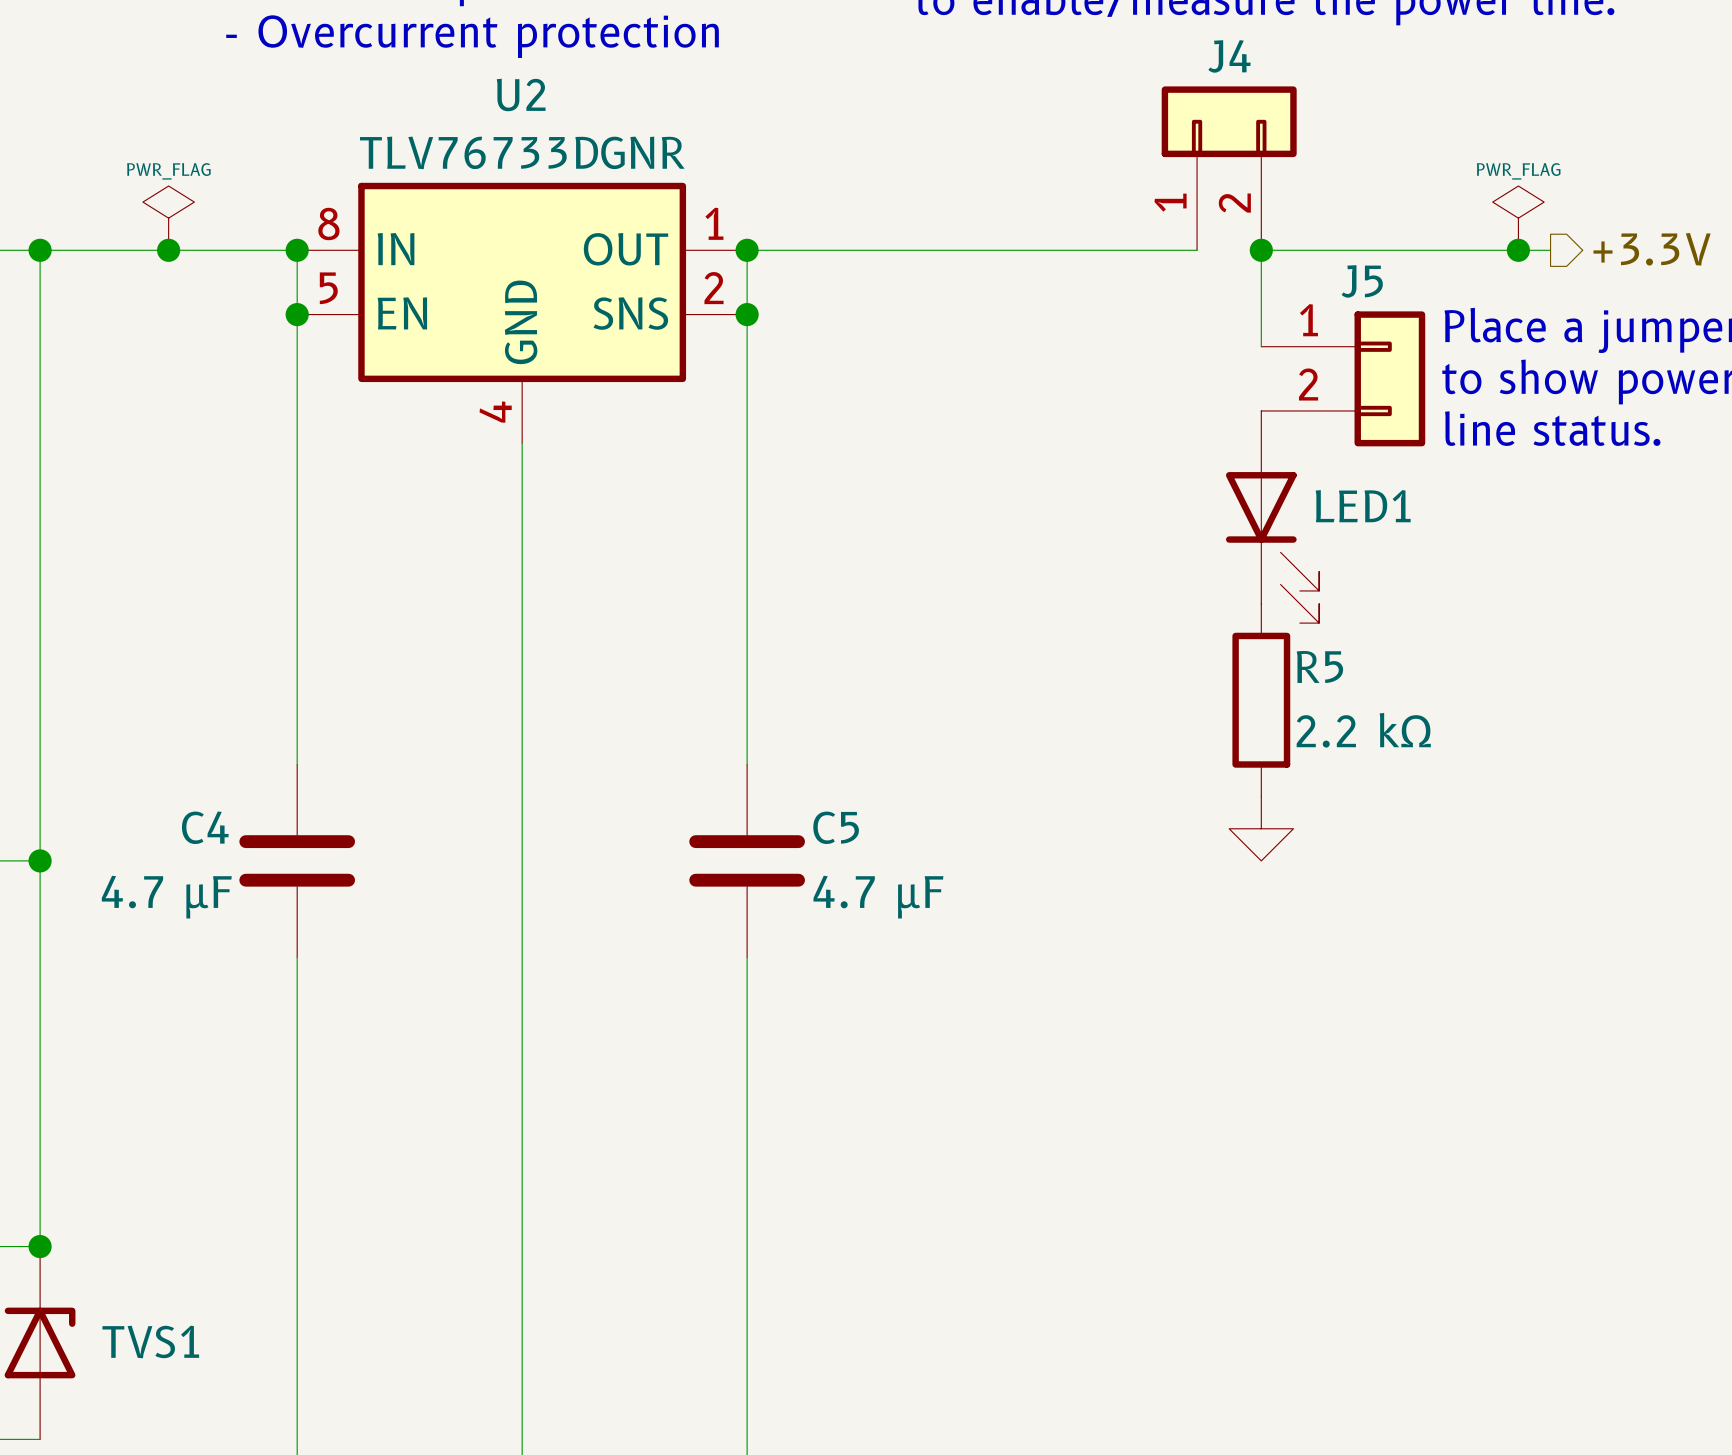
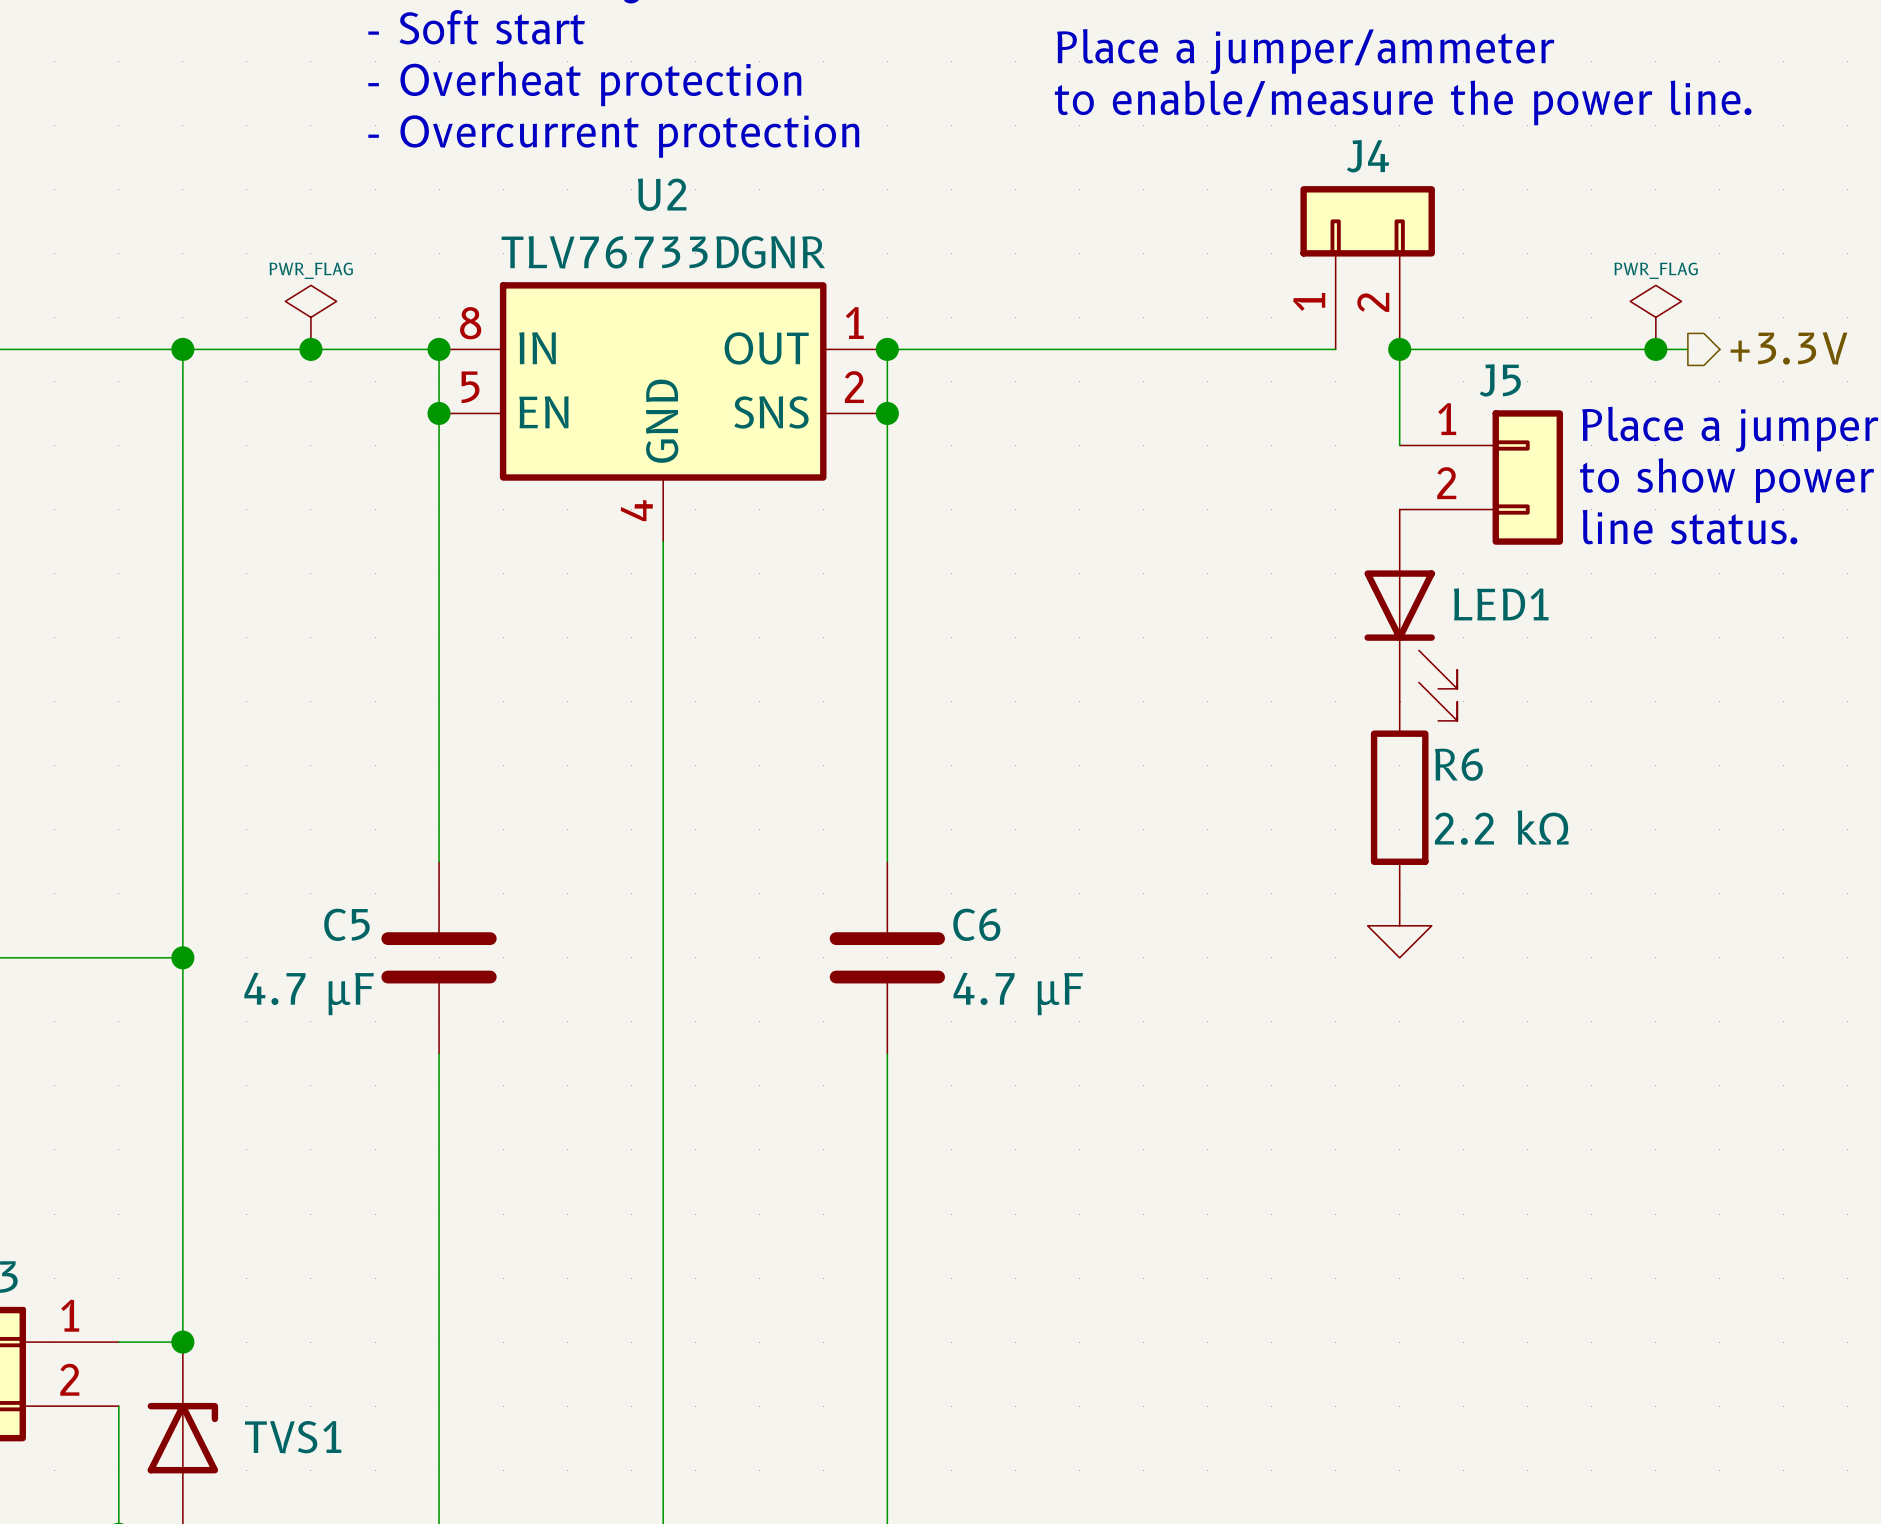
R5 name: R5 (1319, 666) -> R6 (1458, 764)
C4 name: C4 (205, 827) -> C5 (346, 924)
C5 name: C5 (836, 827) -> C6 (976, 924)

